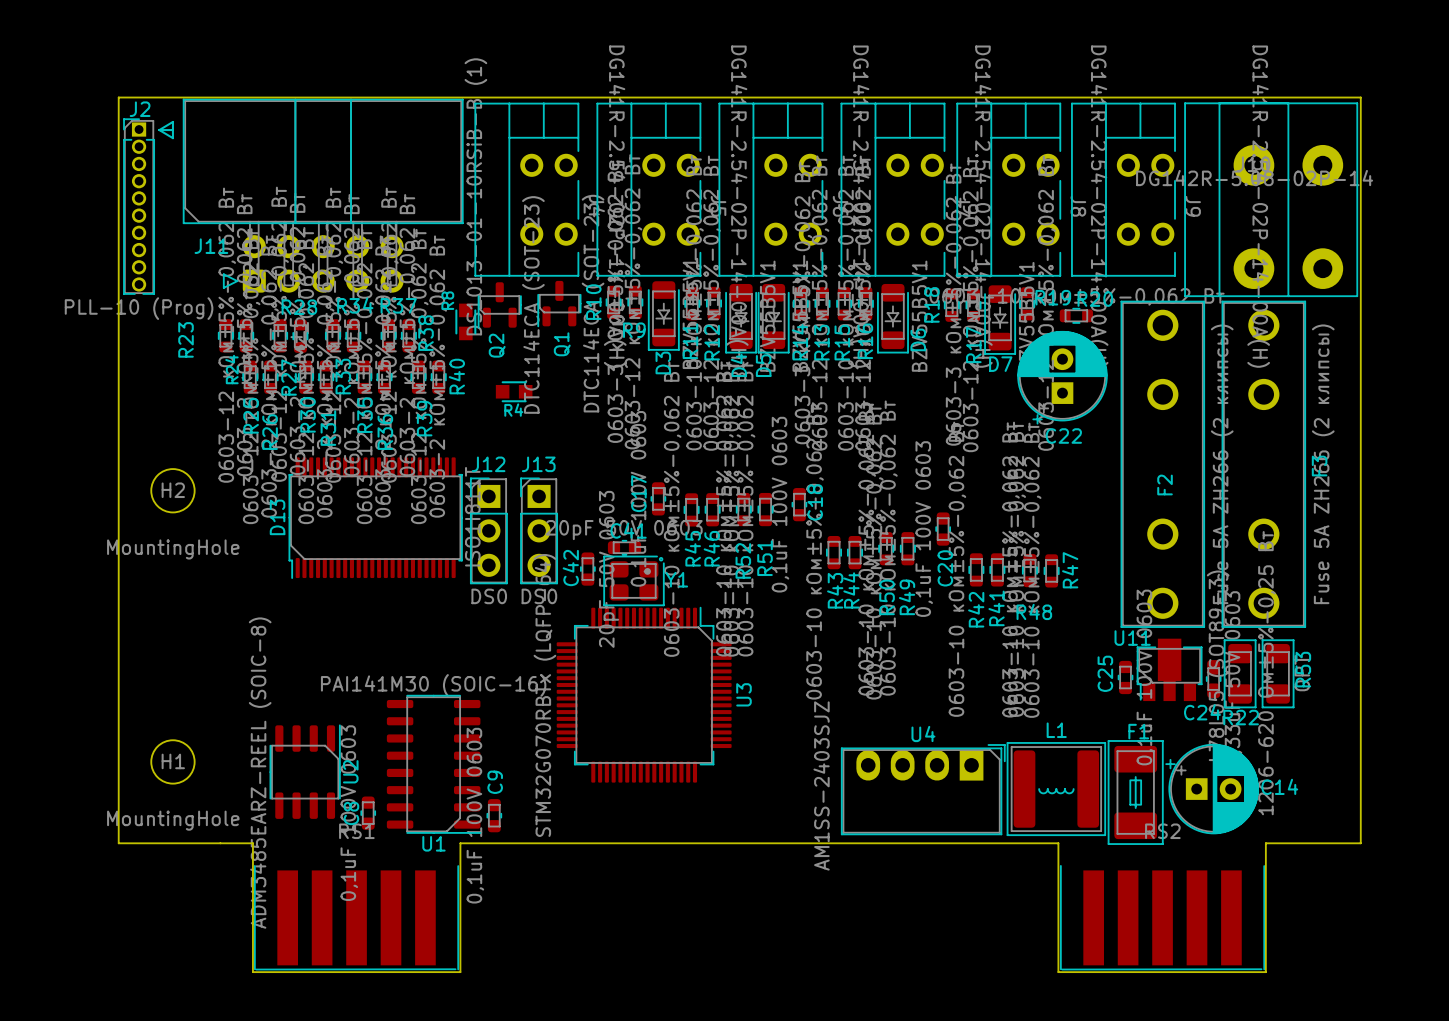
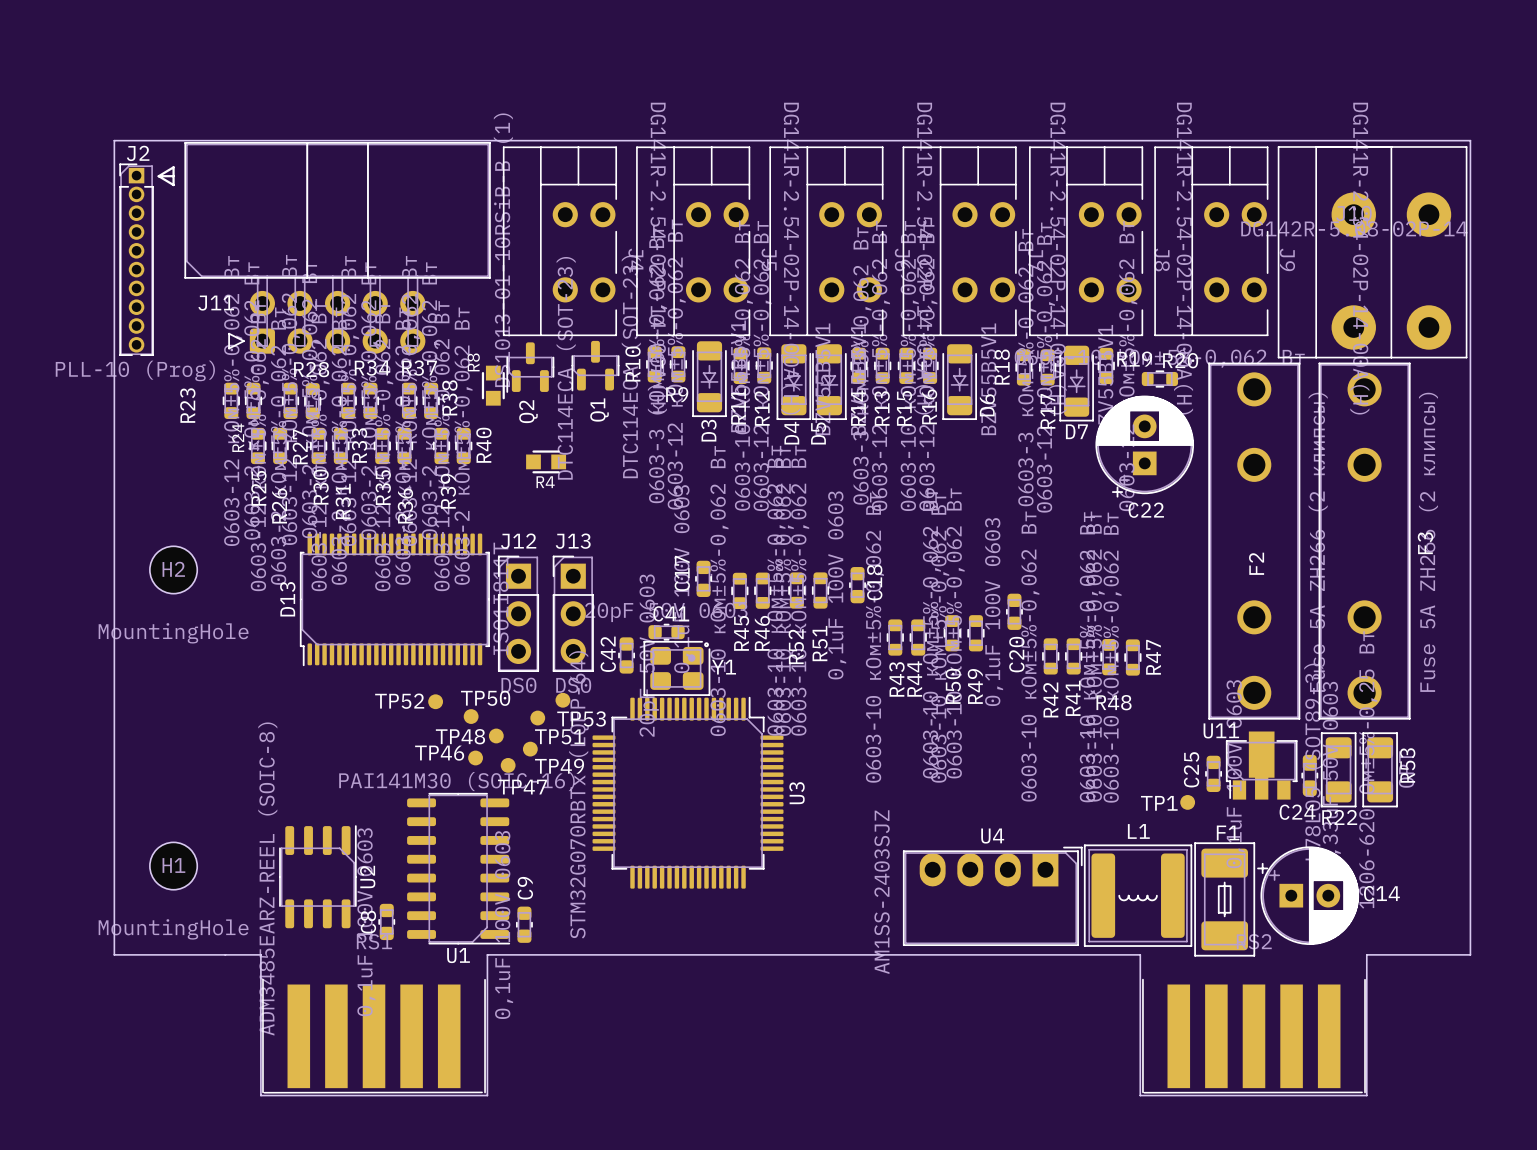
TP53: none -> (562, 700)
TP52: none -> (435, 701)
TP50: none -> (471, 716)
TP51: none -> (537, 718)
TP48: none -> (496, 735)
TP49: none -> (530, 749)
TP46: none -> (475, 757)
TP47: none -> (508, 765)
TP1: none -> (1187, 802)

